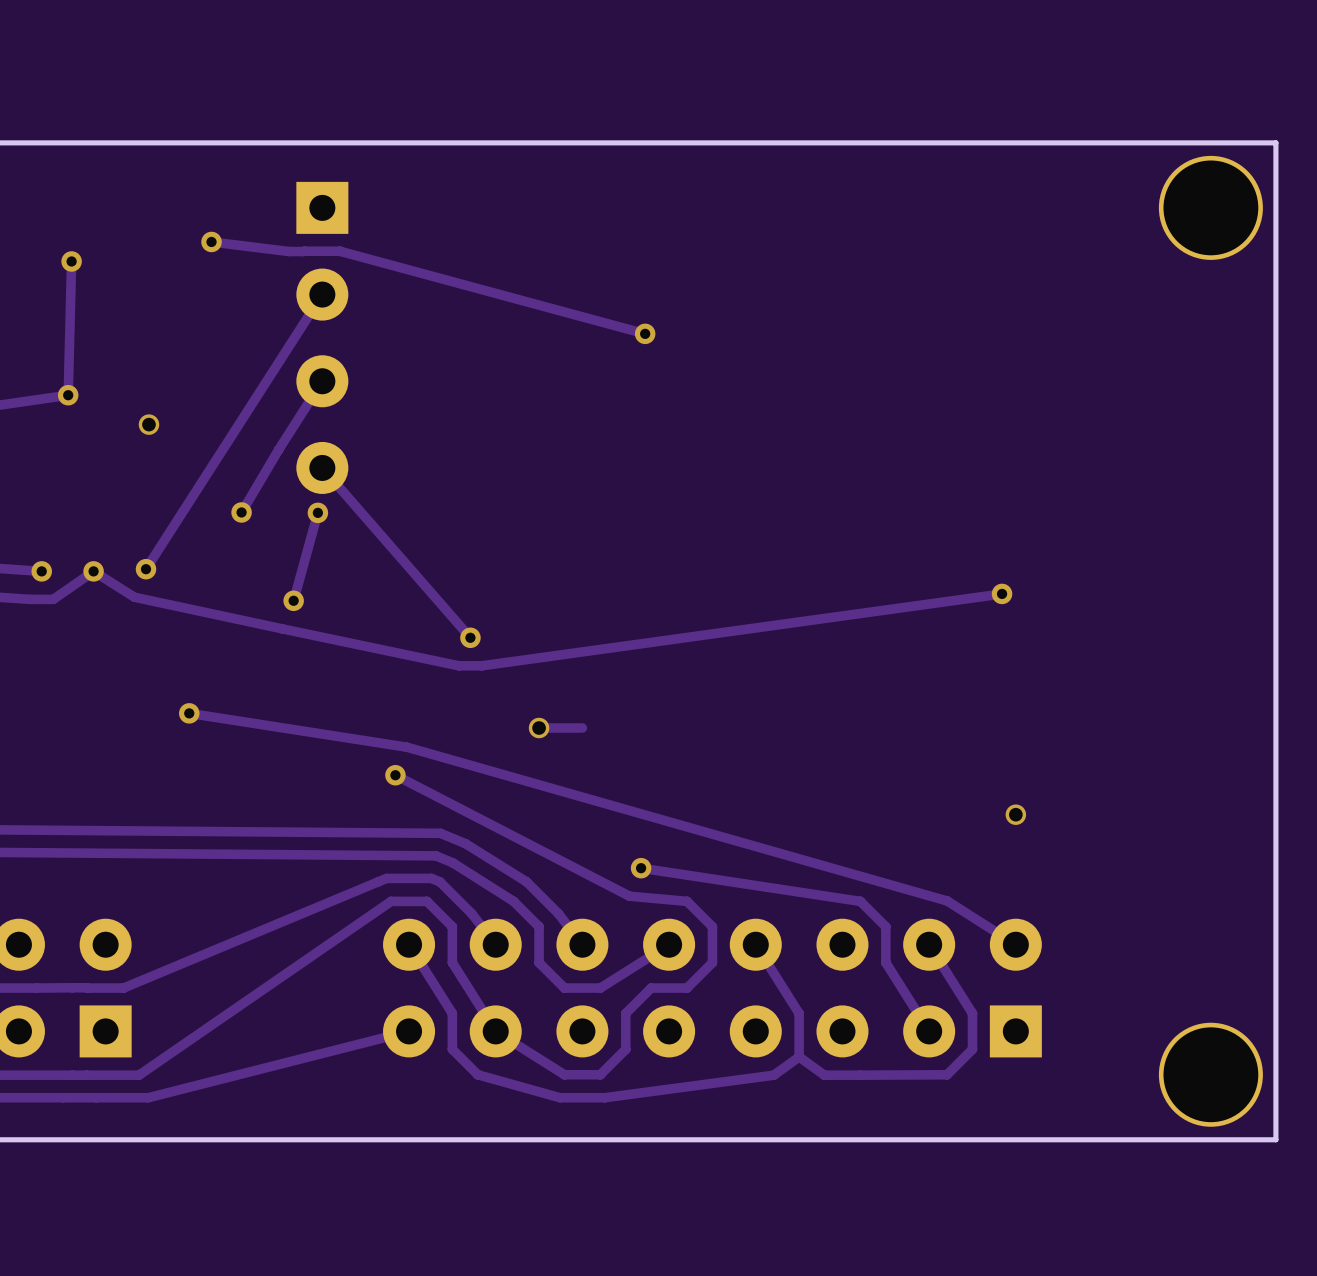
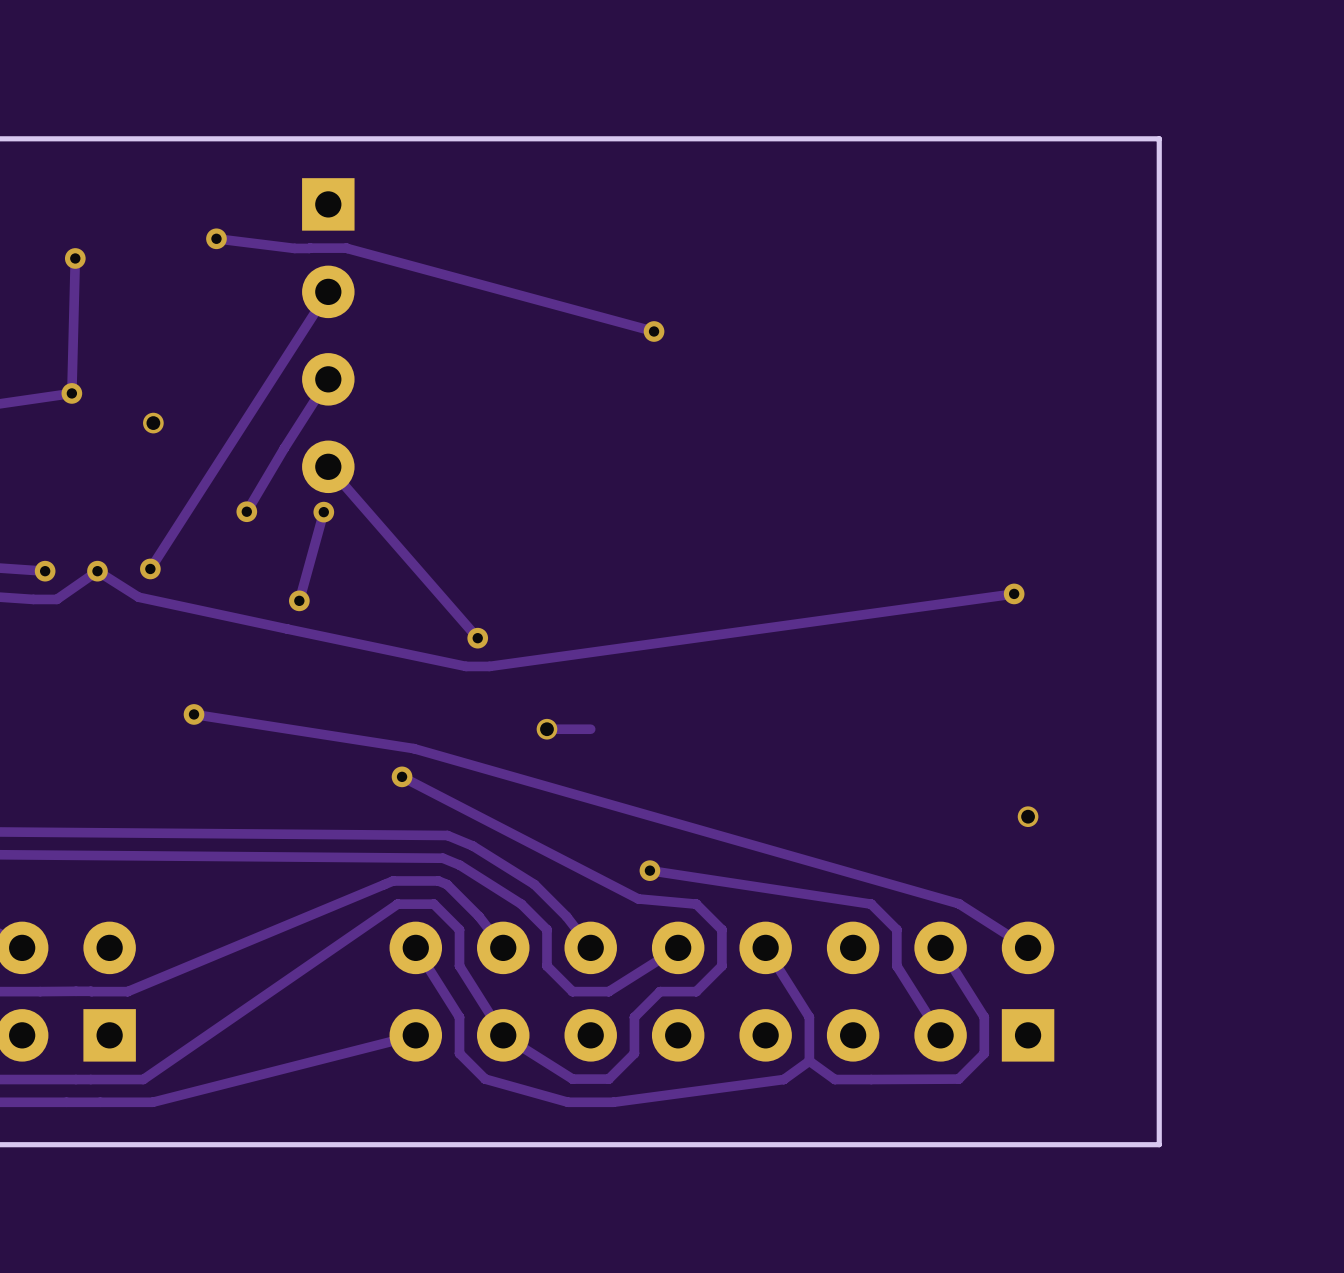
board edge: (1145, 142) (1275, 142) (1275, 1139) (1145, 1139) -> (1159, 138) (1159, 1144)
part: (1210, 207) -> none
part: (1210, 1074) -> none

